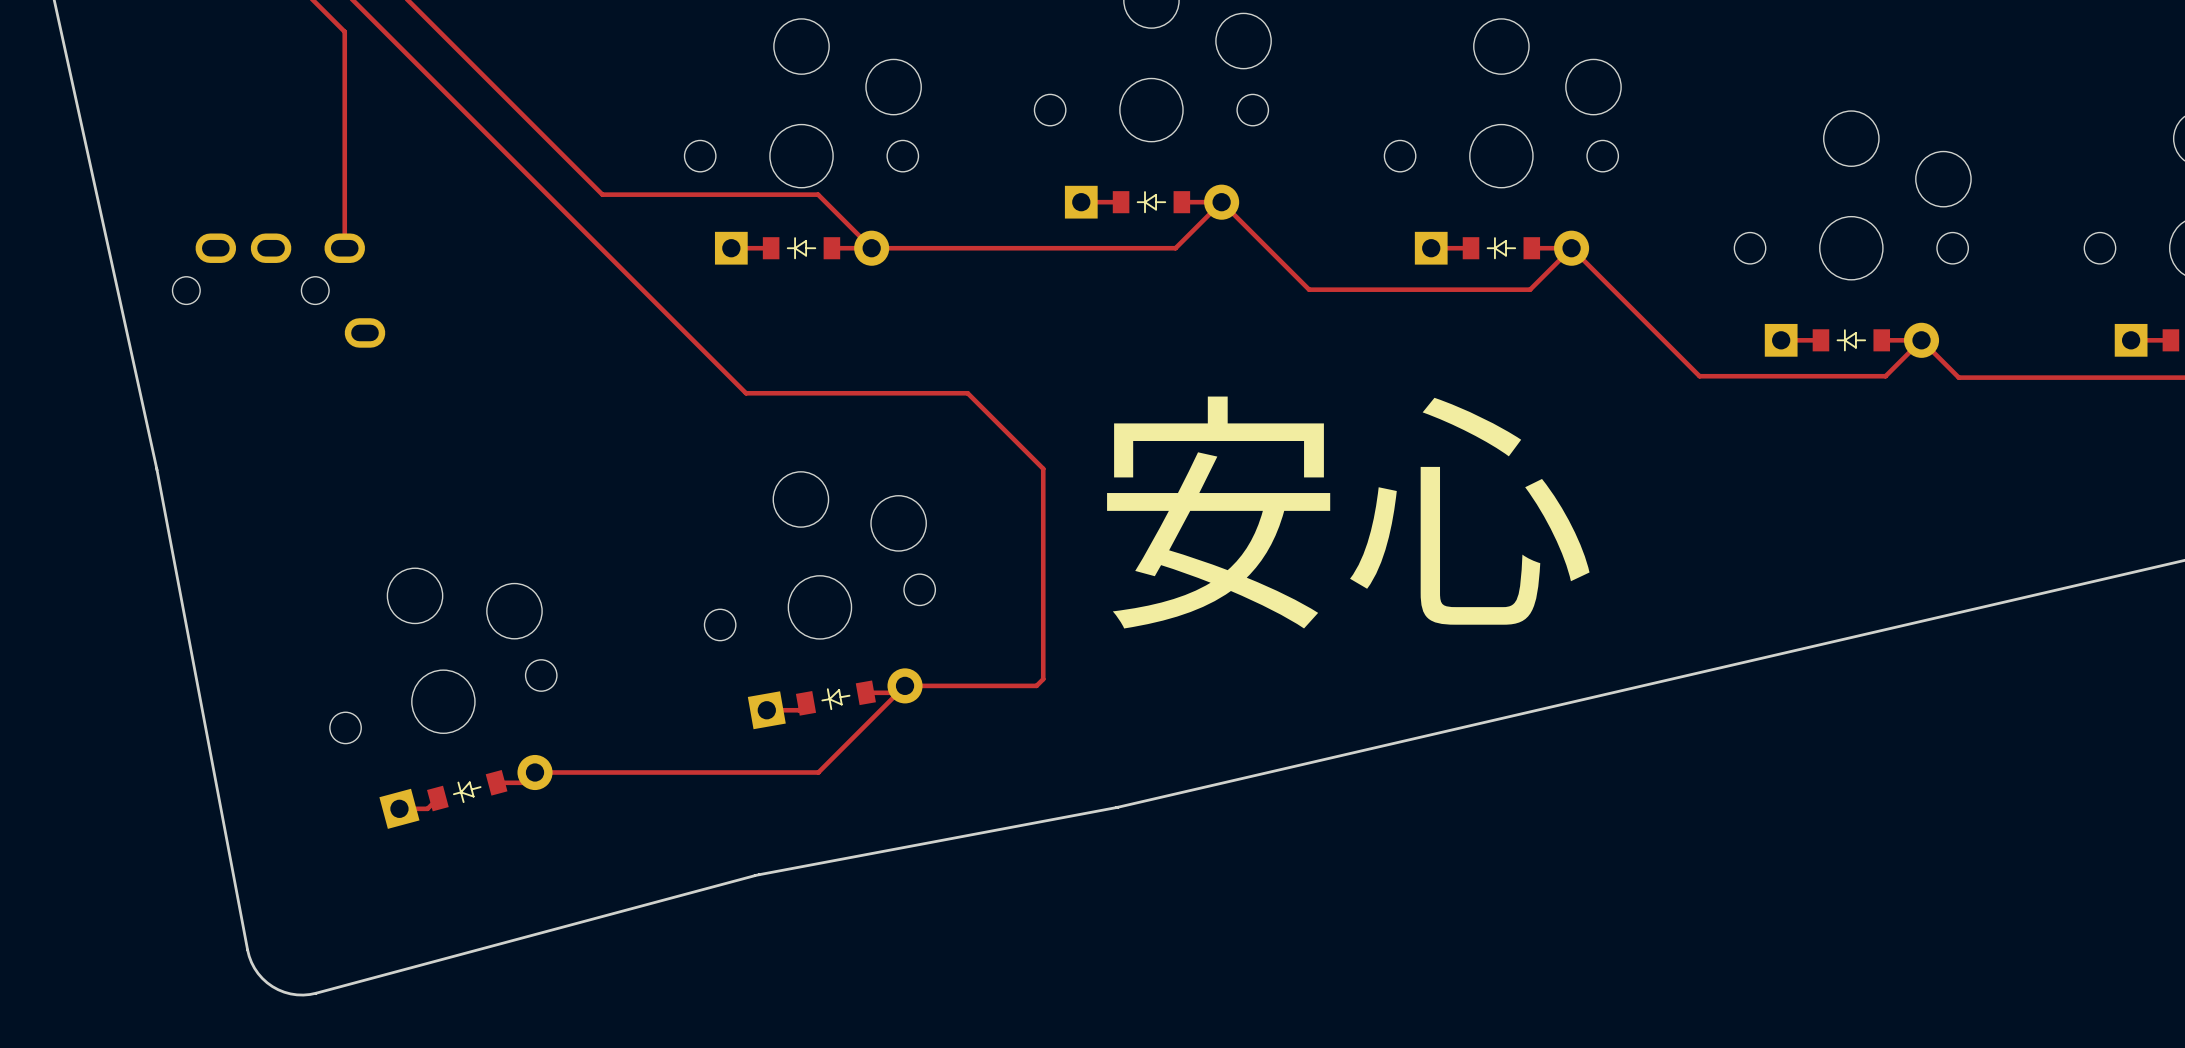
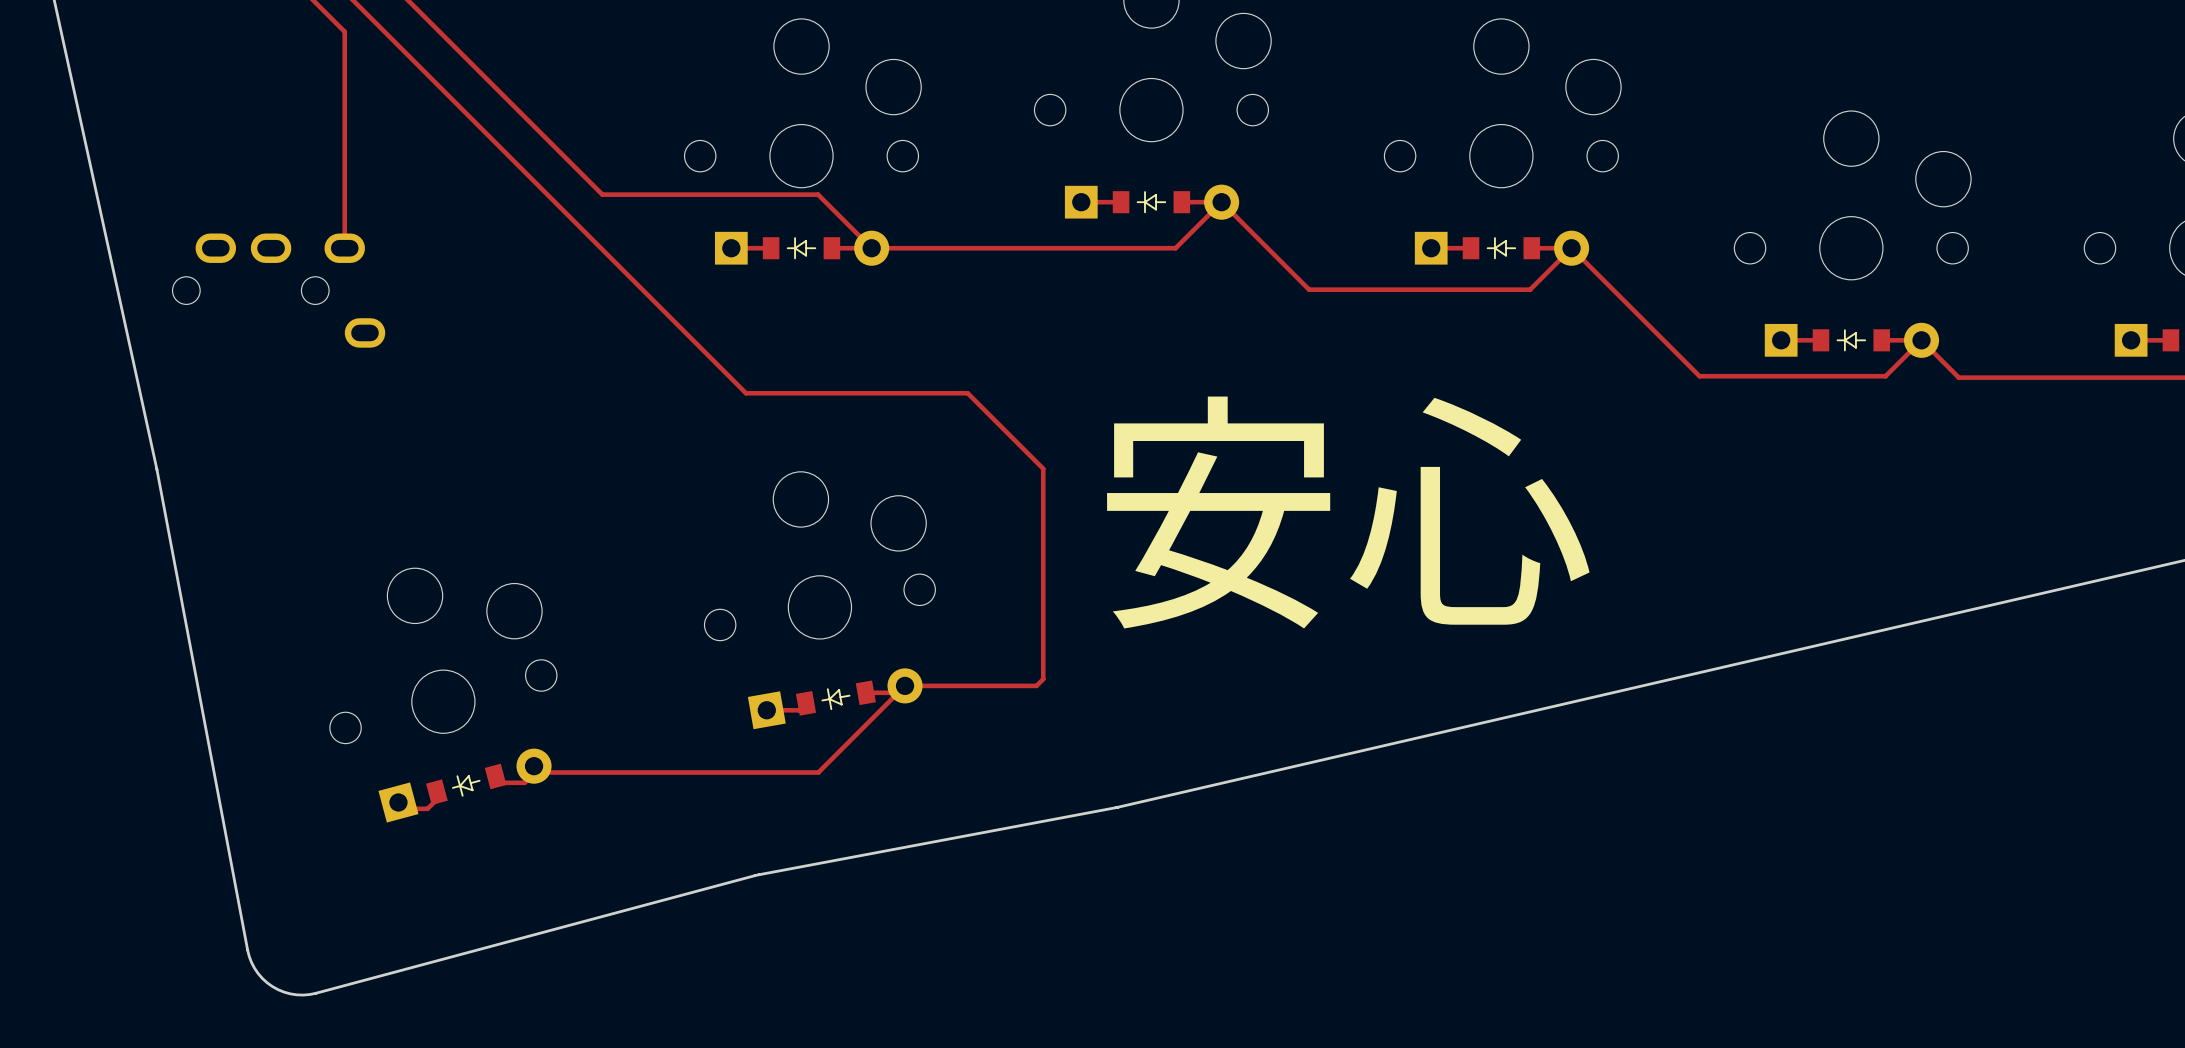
part footprint: [379, 754, 553, 829] -> [378, 748, 552, 823]

